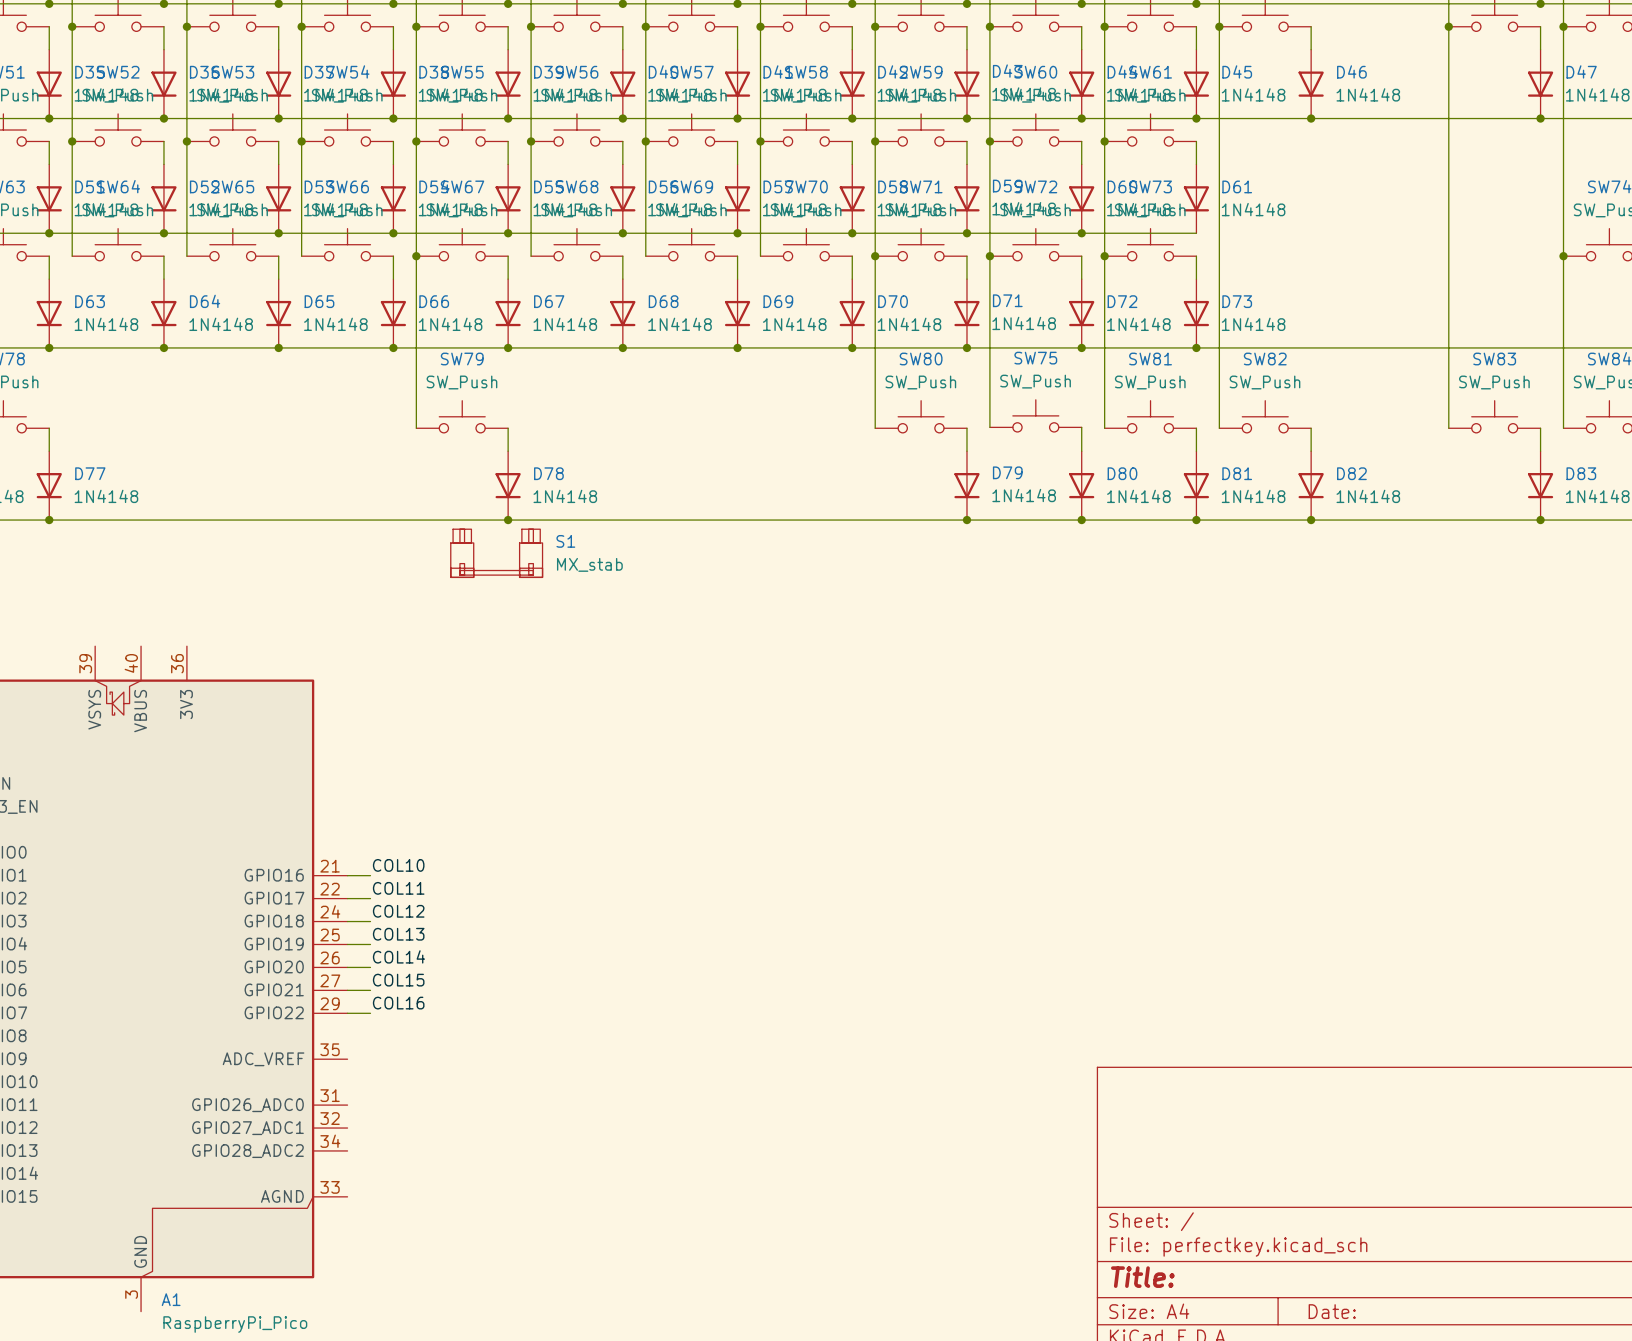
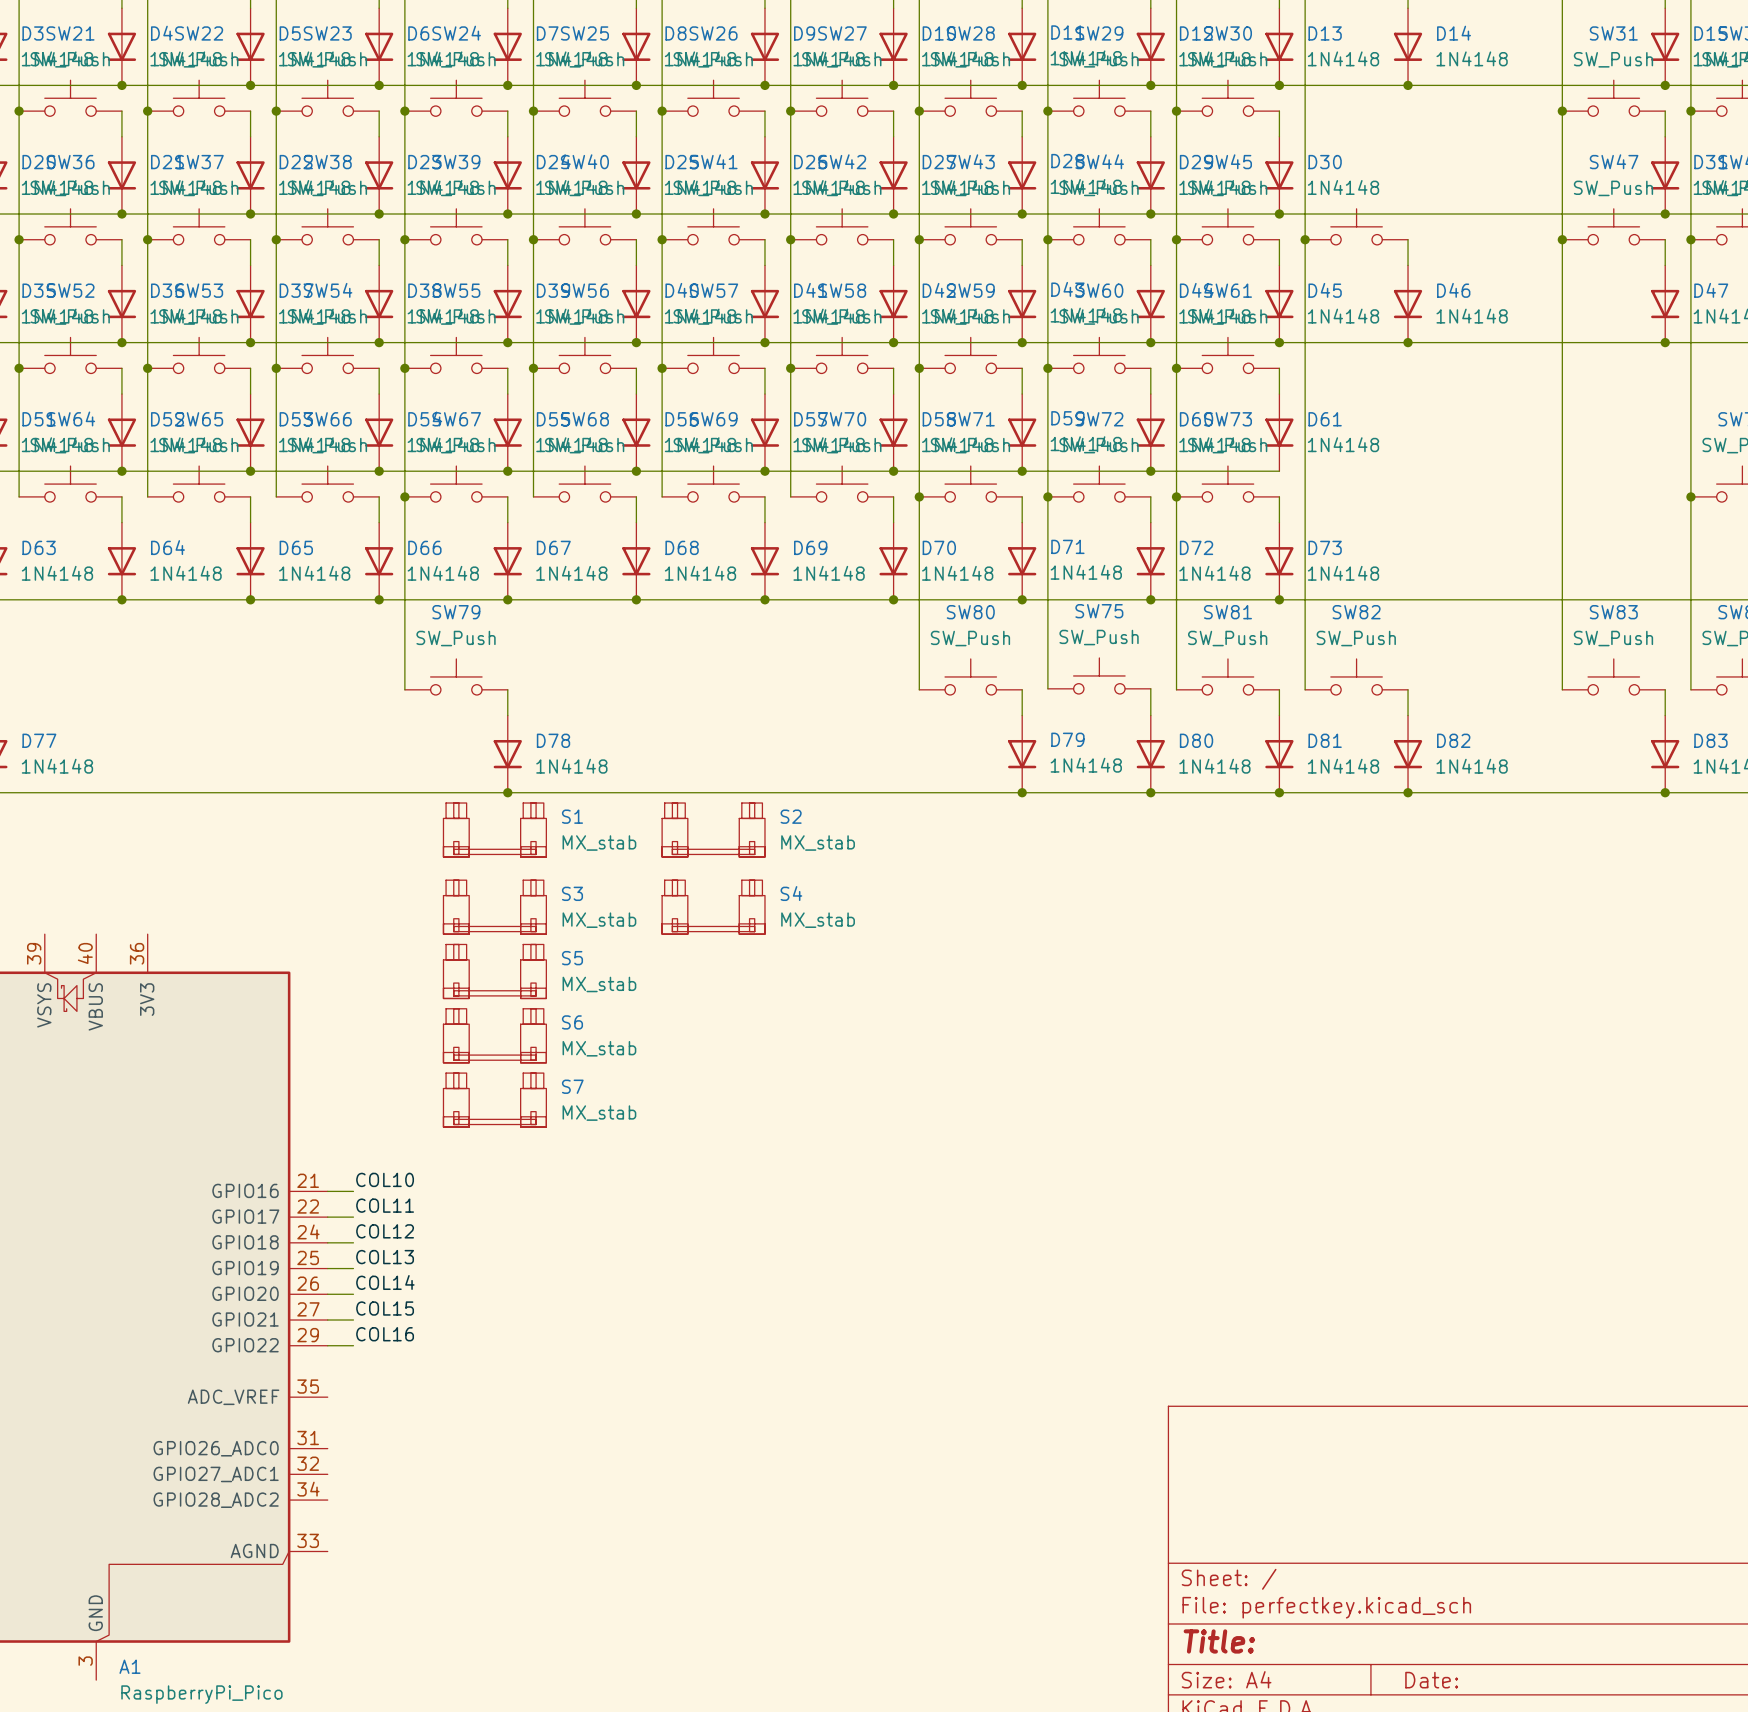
S2: none -> MX_stab (713, 830)
S3: none -> MX_stab (494, 907)
S4: none -> MX_stab (713, 907)
S5: none -> MX_stab (494, 971)
S6: none -> MX_stab (494, 1035)
S7: none -> MX_stab (494, 1100)

